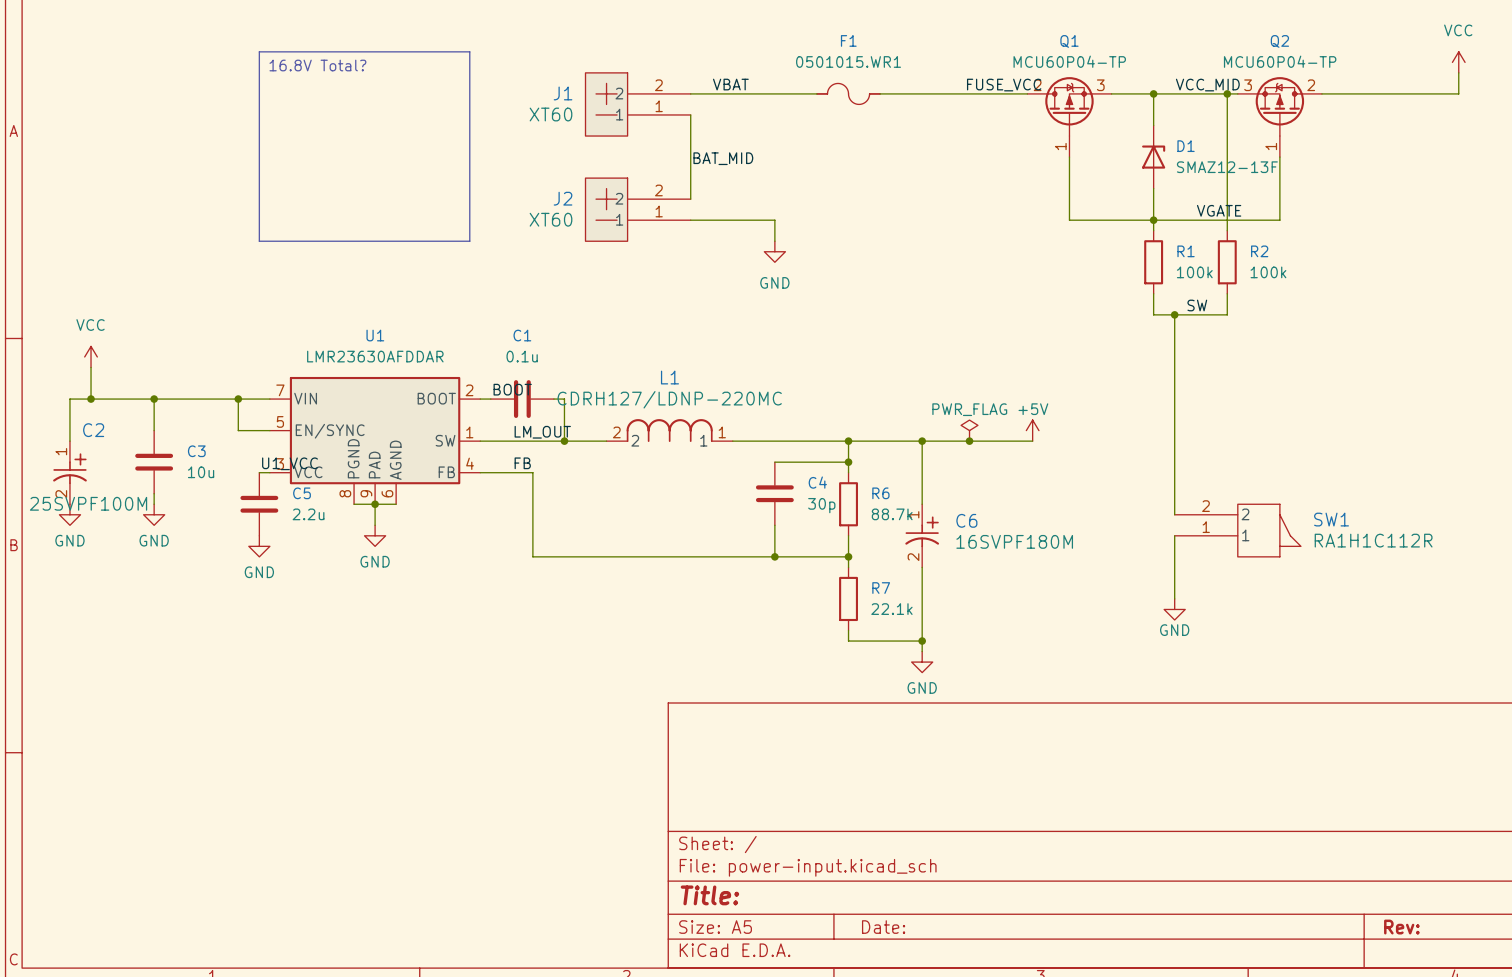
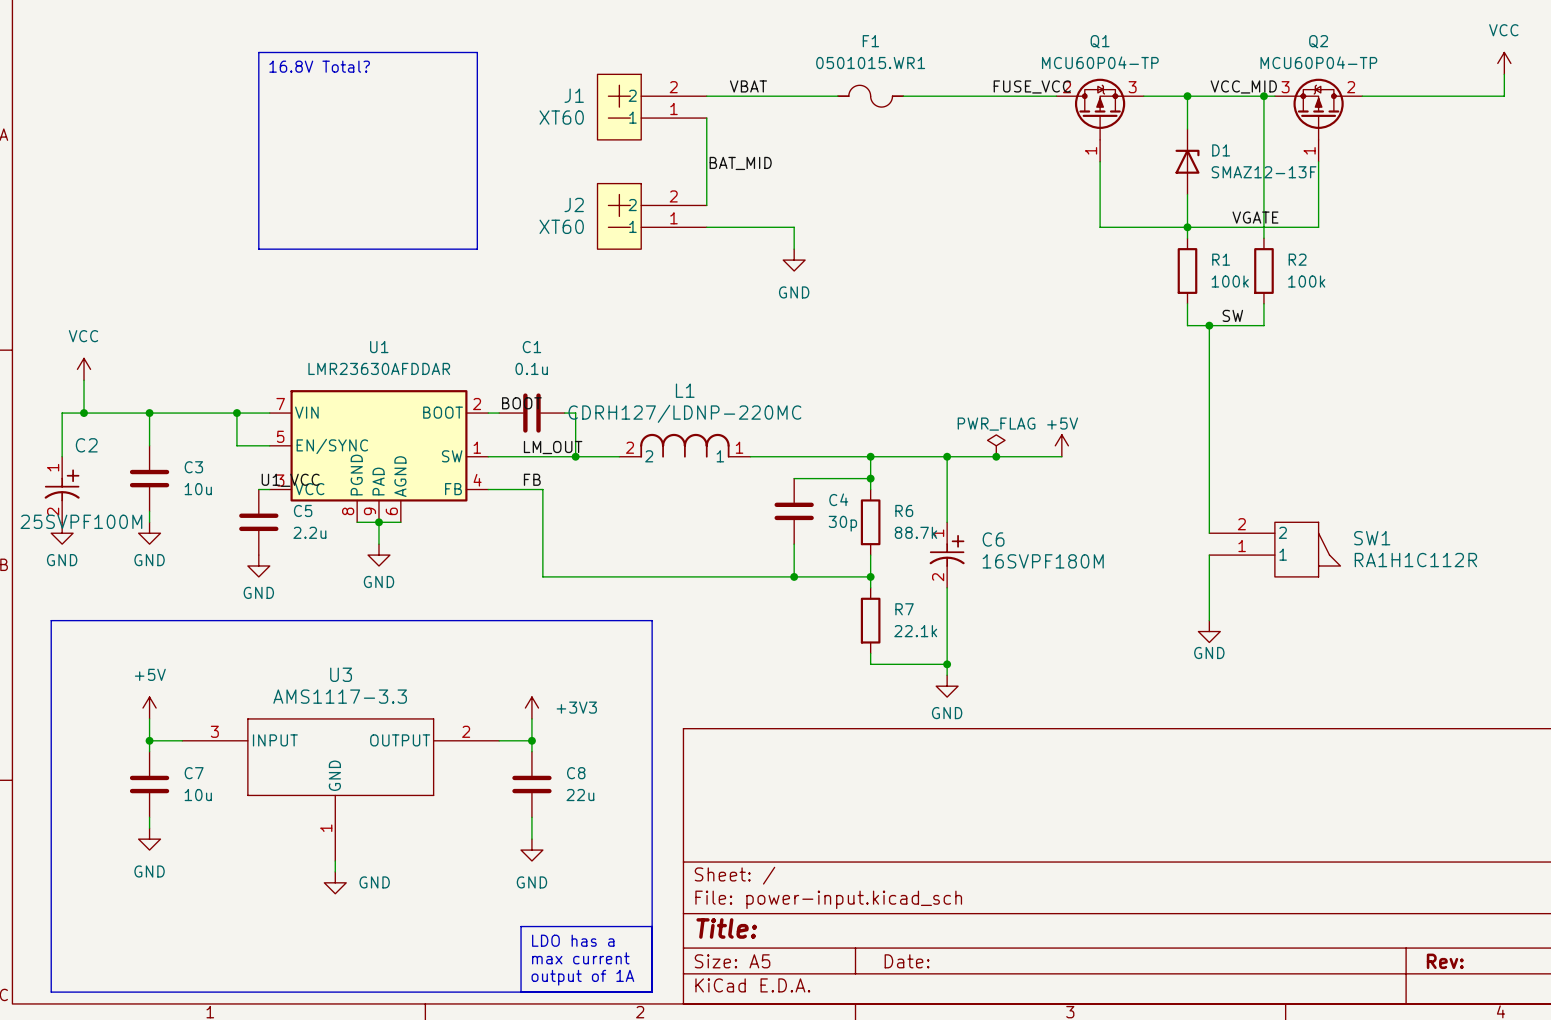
line: none -> (51, 620) (652, 620) (652, 992) (51, 992) (51, 620)
power symbol: none -> +5V (149, 708)
power symbol: none -> +3V3 (531, 708)
wire: none -> (149, 718) (149, 751)
wire: none -> (531, 718) (531, 751)
wire: none -> (149, 740) (182, 740)
junction: none -> (149, 740)
wire: none -> (499, 740) (531, 740)
junction: none -> (531, 740)
C7: none -> 10u (149, 784)
C8: none -> 22u (531, 784)
U3: none -> AMS1117-3.3 (340, 789)
wire: none -> (149, 817) (149, 828)
wire: none -> (531, 817) (531, 839)
power symbol: none -> GND (149, 839)
power symbol: none -> GND (531, 850)
wire: none -> (335, 860) (335, 871)
power symbol: none -> GND (335, 882)
line: none -> (652, 926) (521, 926) (521, 992)
text: none -> LDO has a (573, 940)
text: none -> max current (580, 958)
text: none -> output of 1A (582, 977)

